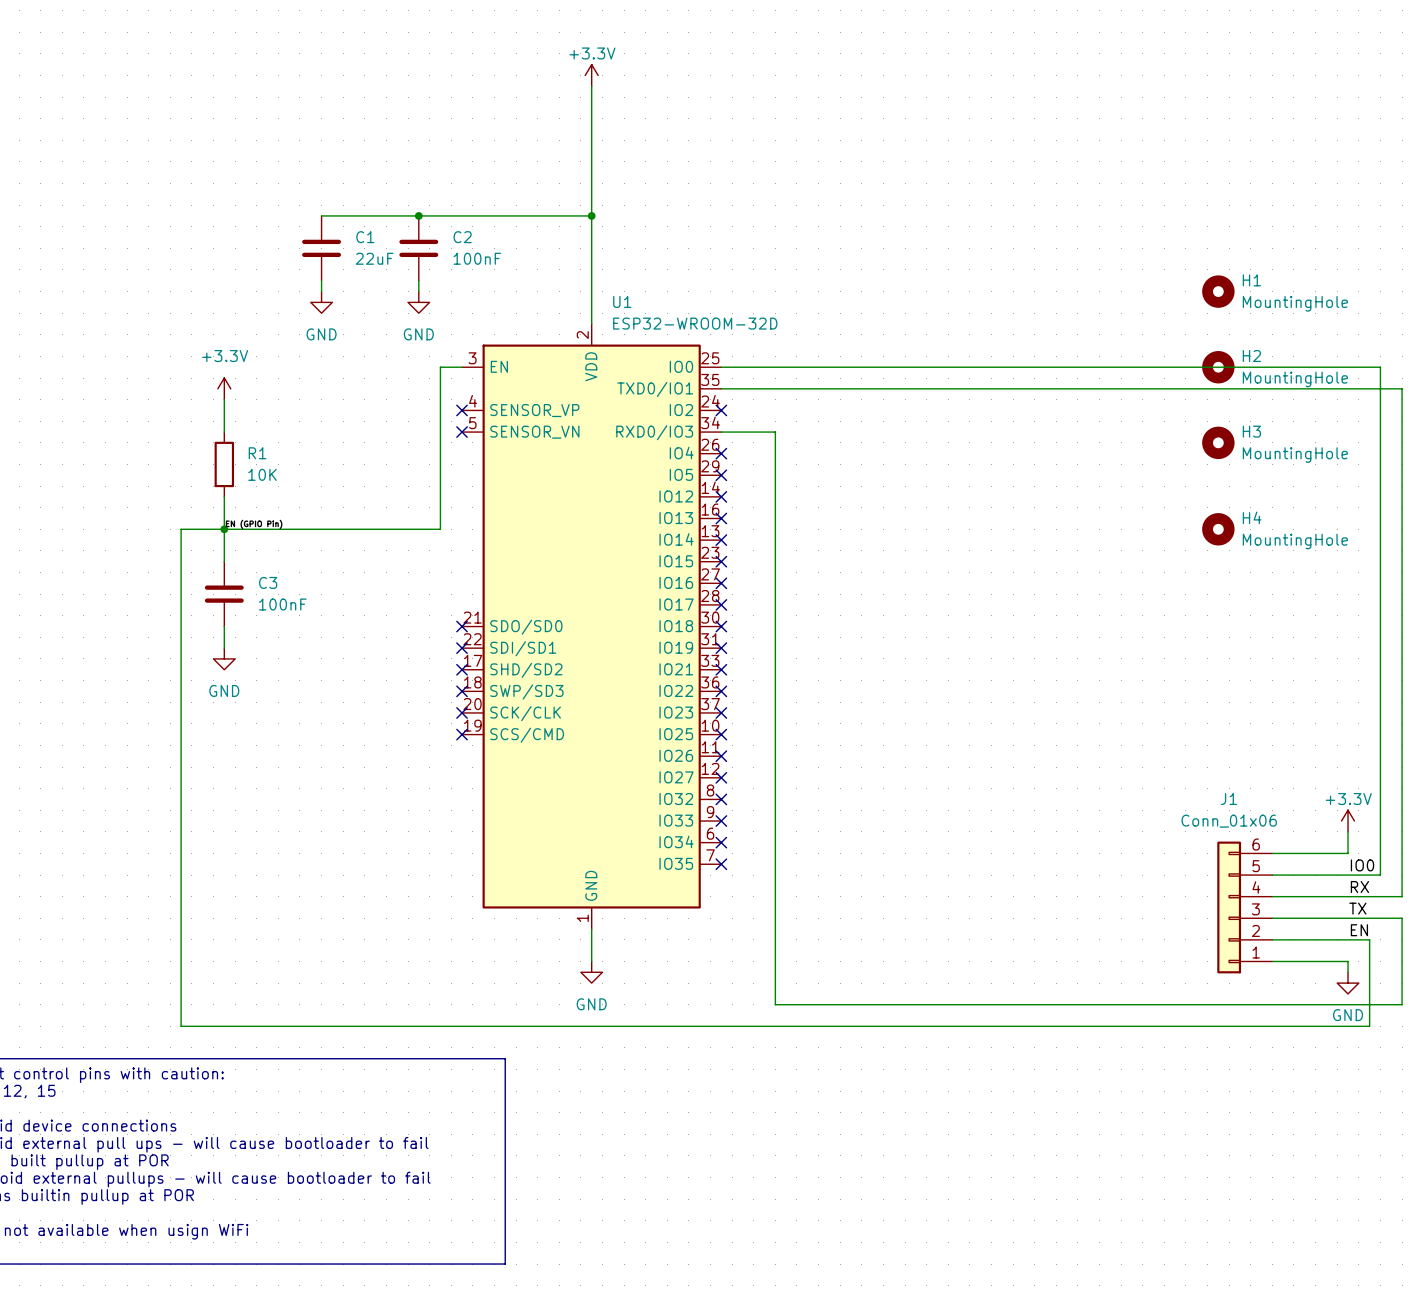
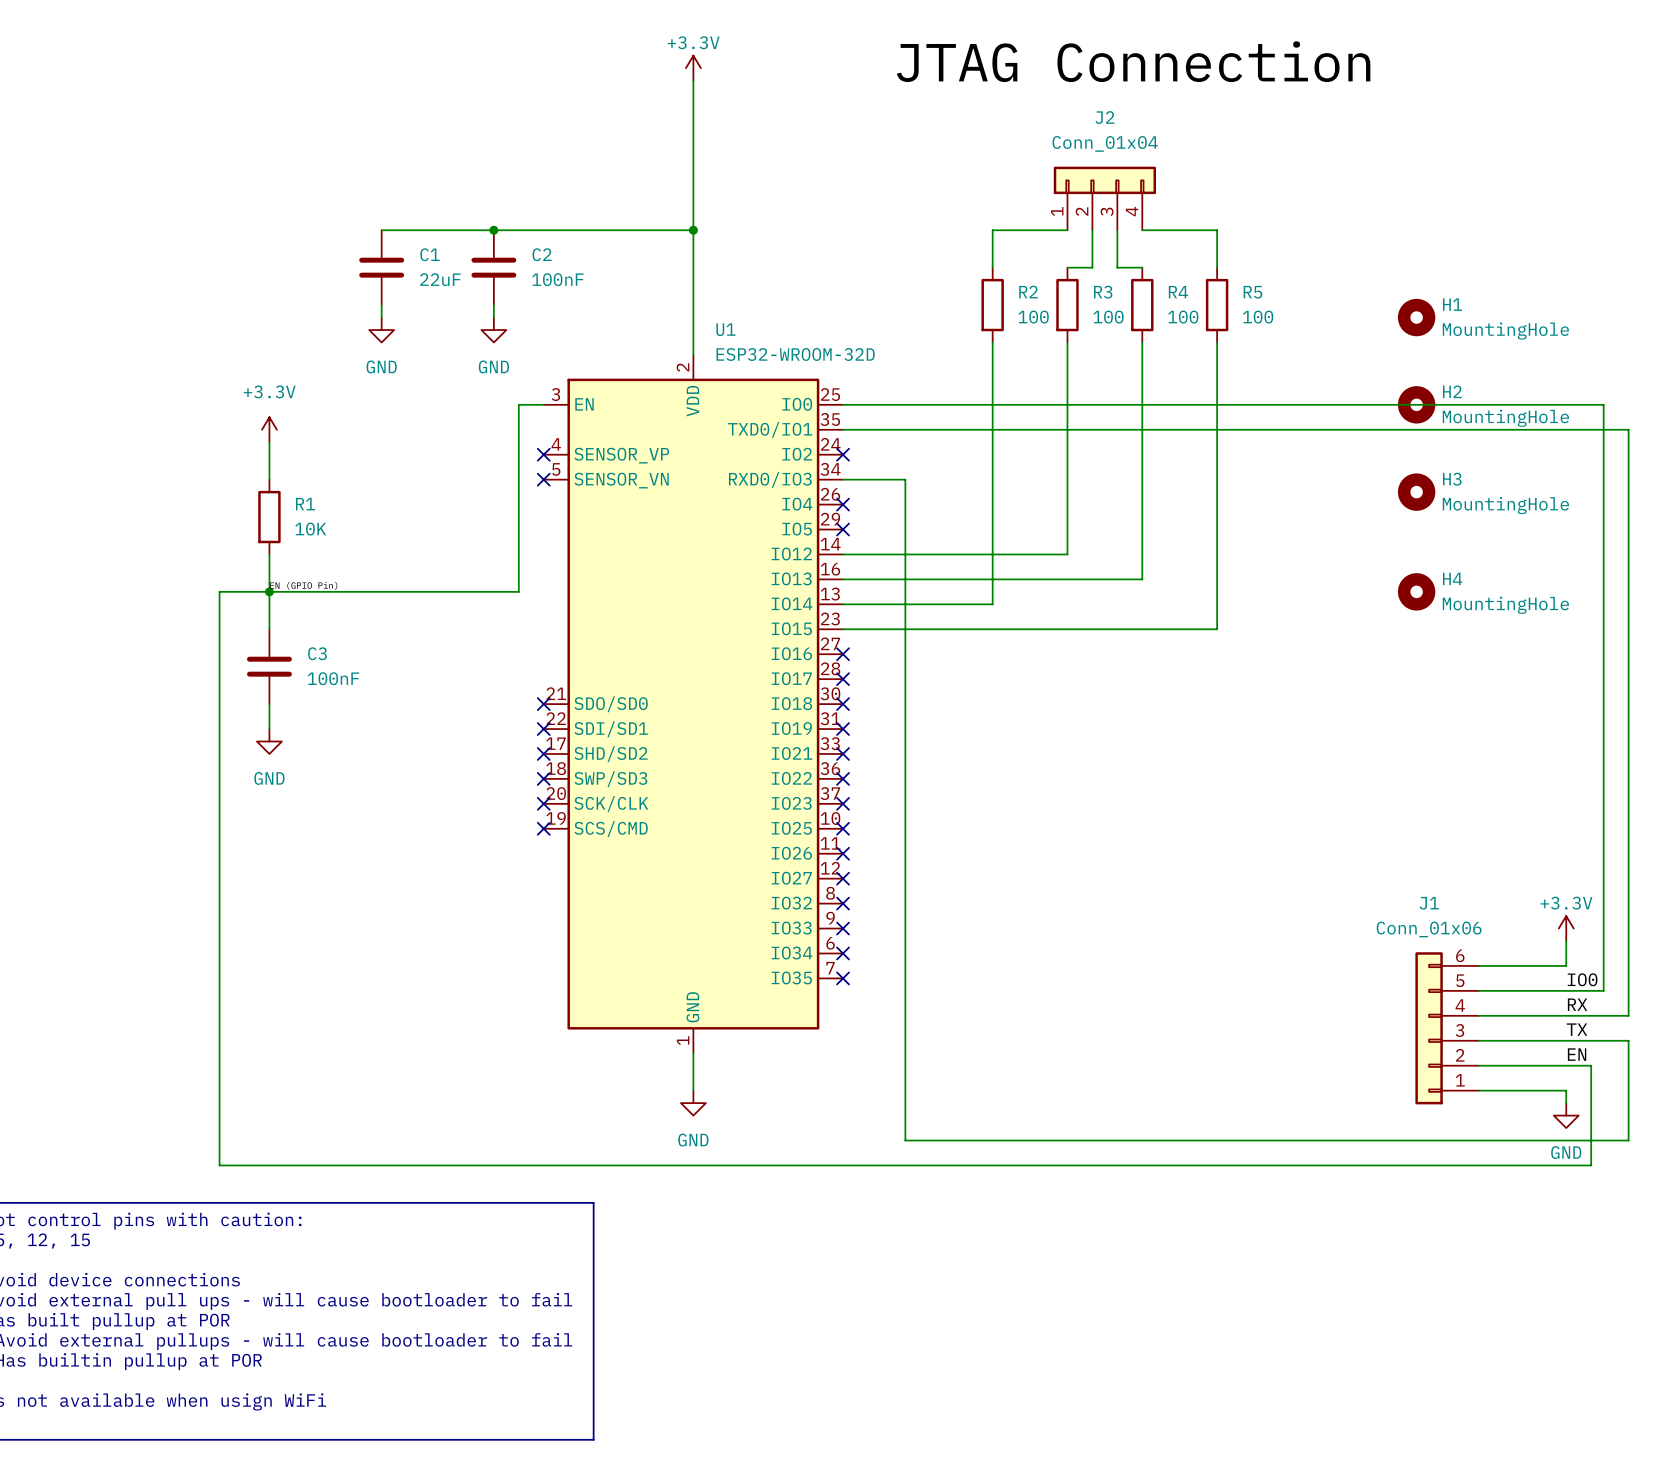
label: none -> JTAG Connection (1133, 61)
J2: none -> Conn_01x04 (1104, 198)
wire: none -> (1067, 230) (992, 230) (992, 267)
wire: none -> (1092, 230) (1092, 267) (1067, 267)
wire: none -> (1117, 230) (1117, 267) (1142, 267)
wire: none -> (1142, 230) (1217, 230) (1217, 267)
R2: none -> 100 (992, 305)
R3: none -> 100 (1067, 305)
R4: none -> 100 (1142, 305)
R5: none -> 100 (1217, 305)
wire: none -> (992, 342) (992, 604) (843, 604)
wire: none -> (1067, 342) (1067, 554) (843, 554)
wire: none -> (1142, 342) (1142, 579) (843, 579)
wire: none -> (1217, 342) (1217, 629) (843, 629)
no-connect mark: (721, 496) -> none
no-connect mark: (721, 518) -> none
no-connect mark: (721, 540) -> none
no-connect mark: (721, 561) -> none

